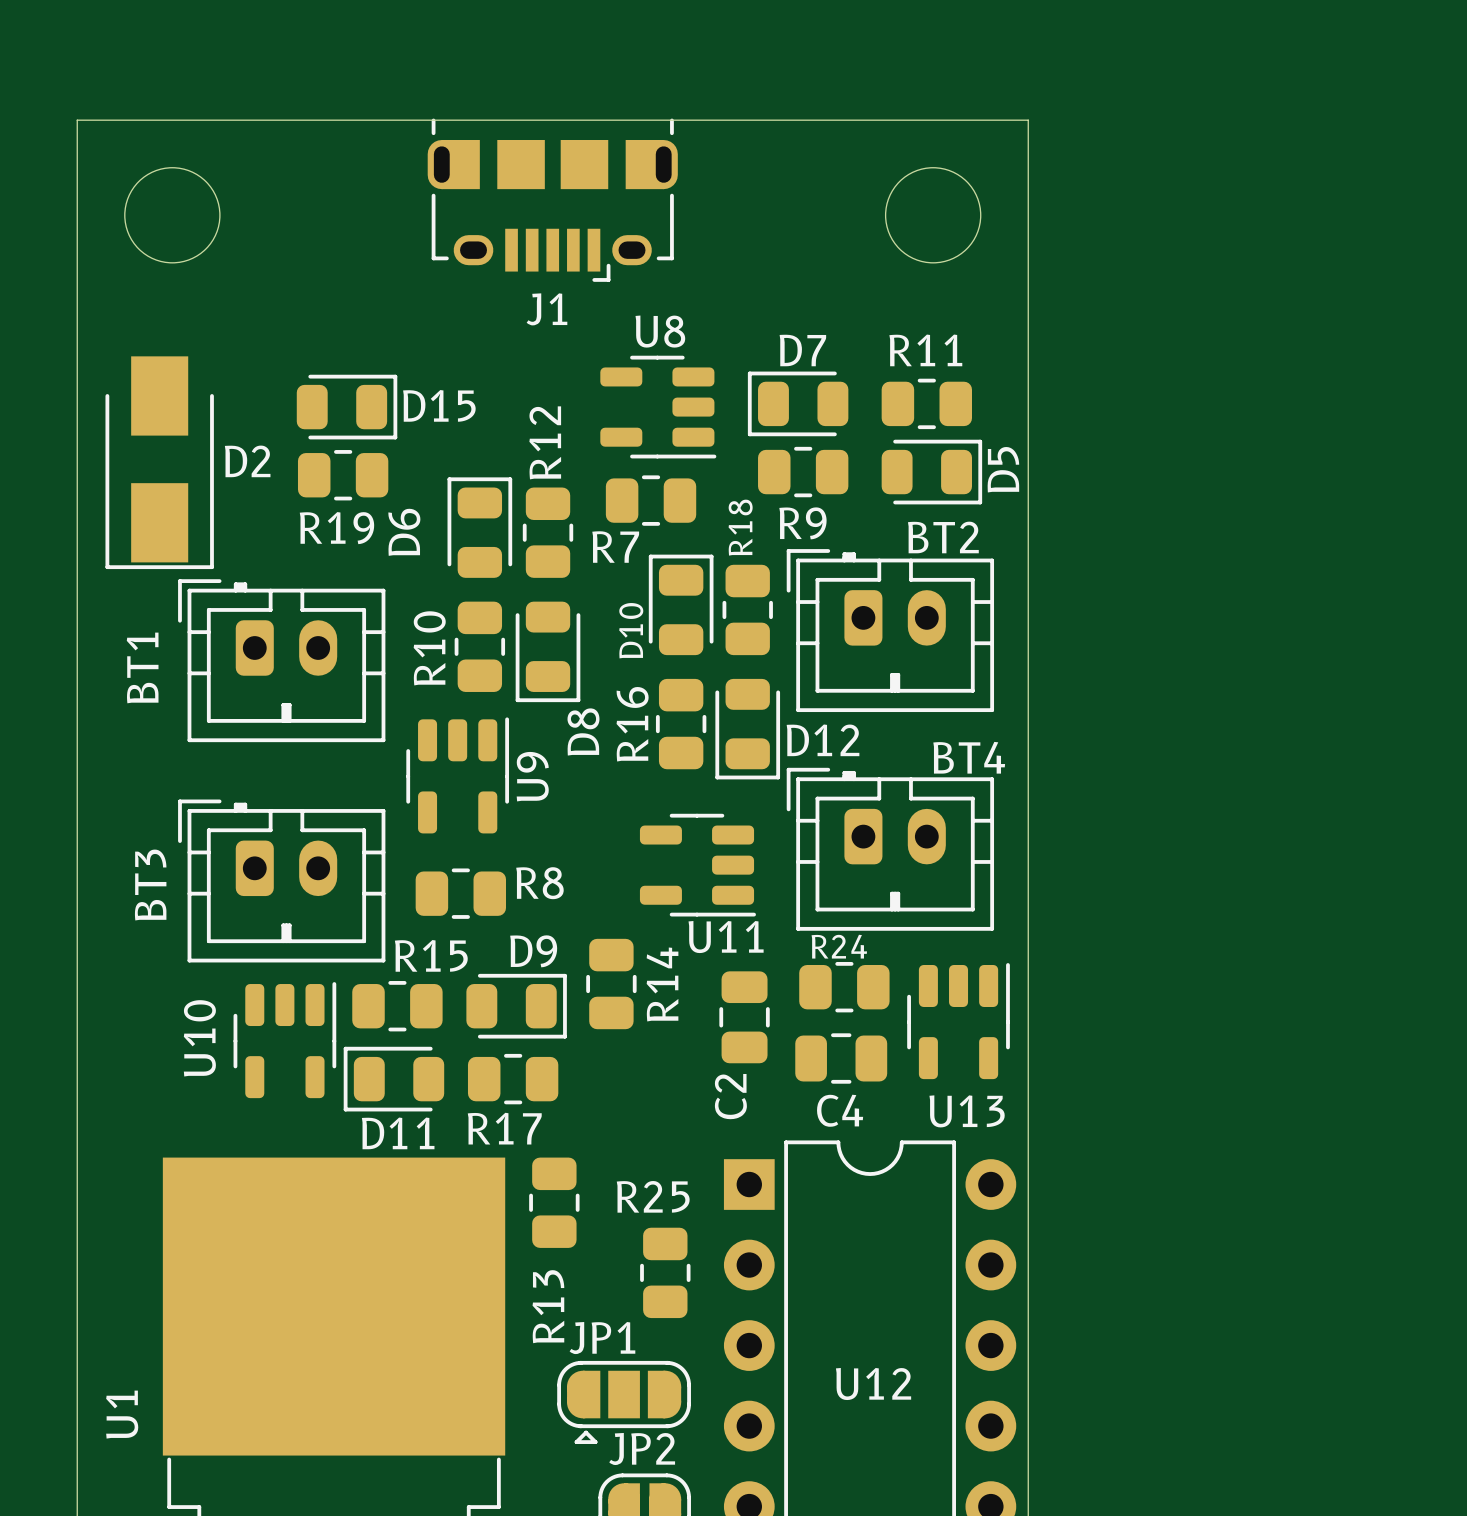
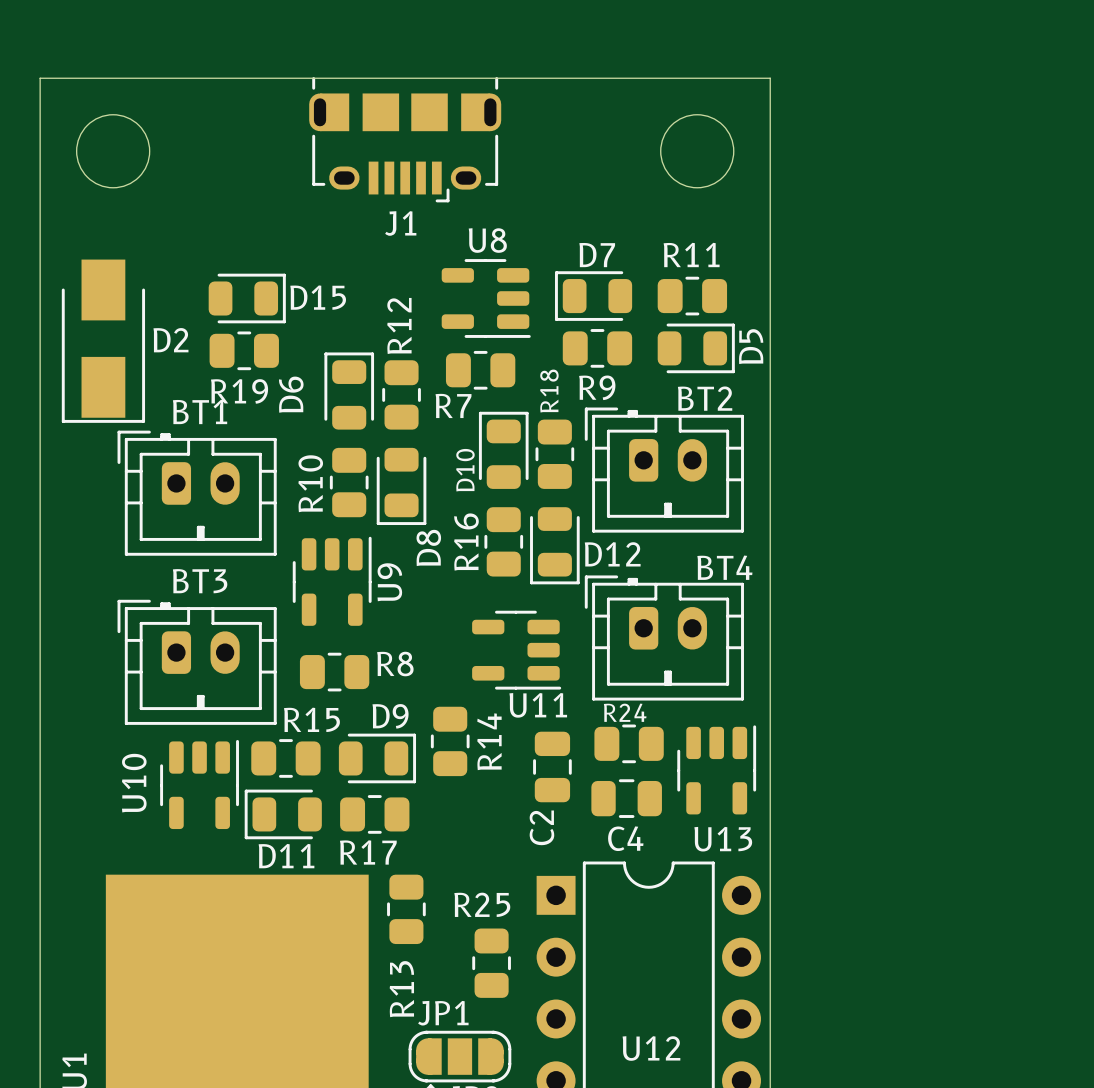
BT1 name rotation: 0° (142, 667) -> 90° clockwise (200, 411)
BT1 name position: BT1 (142, 667) -> BT1 (200, 411)
BT3 name rotation: 0° (150, 885) -> 90° clockwise (200, 581)
BT3 name position: BT3 (150, 885) -> BT3 (200, 581)

